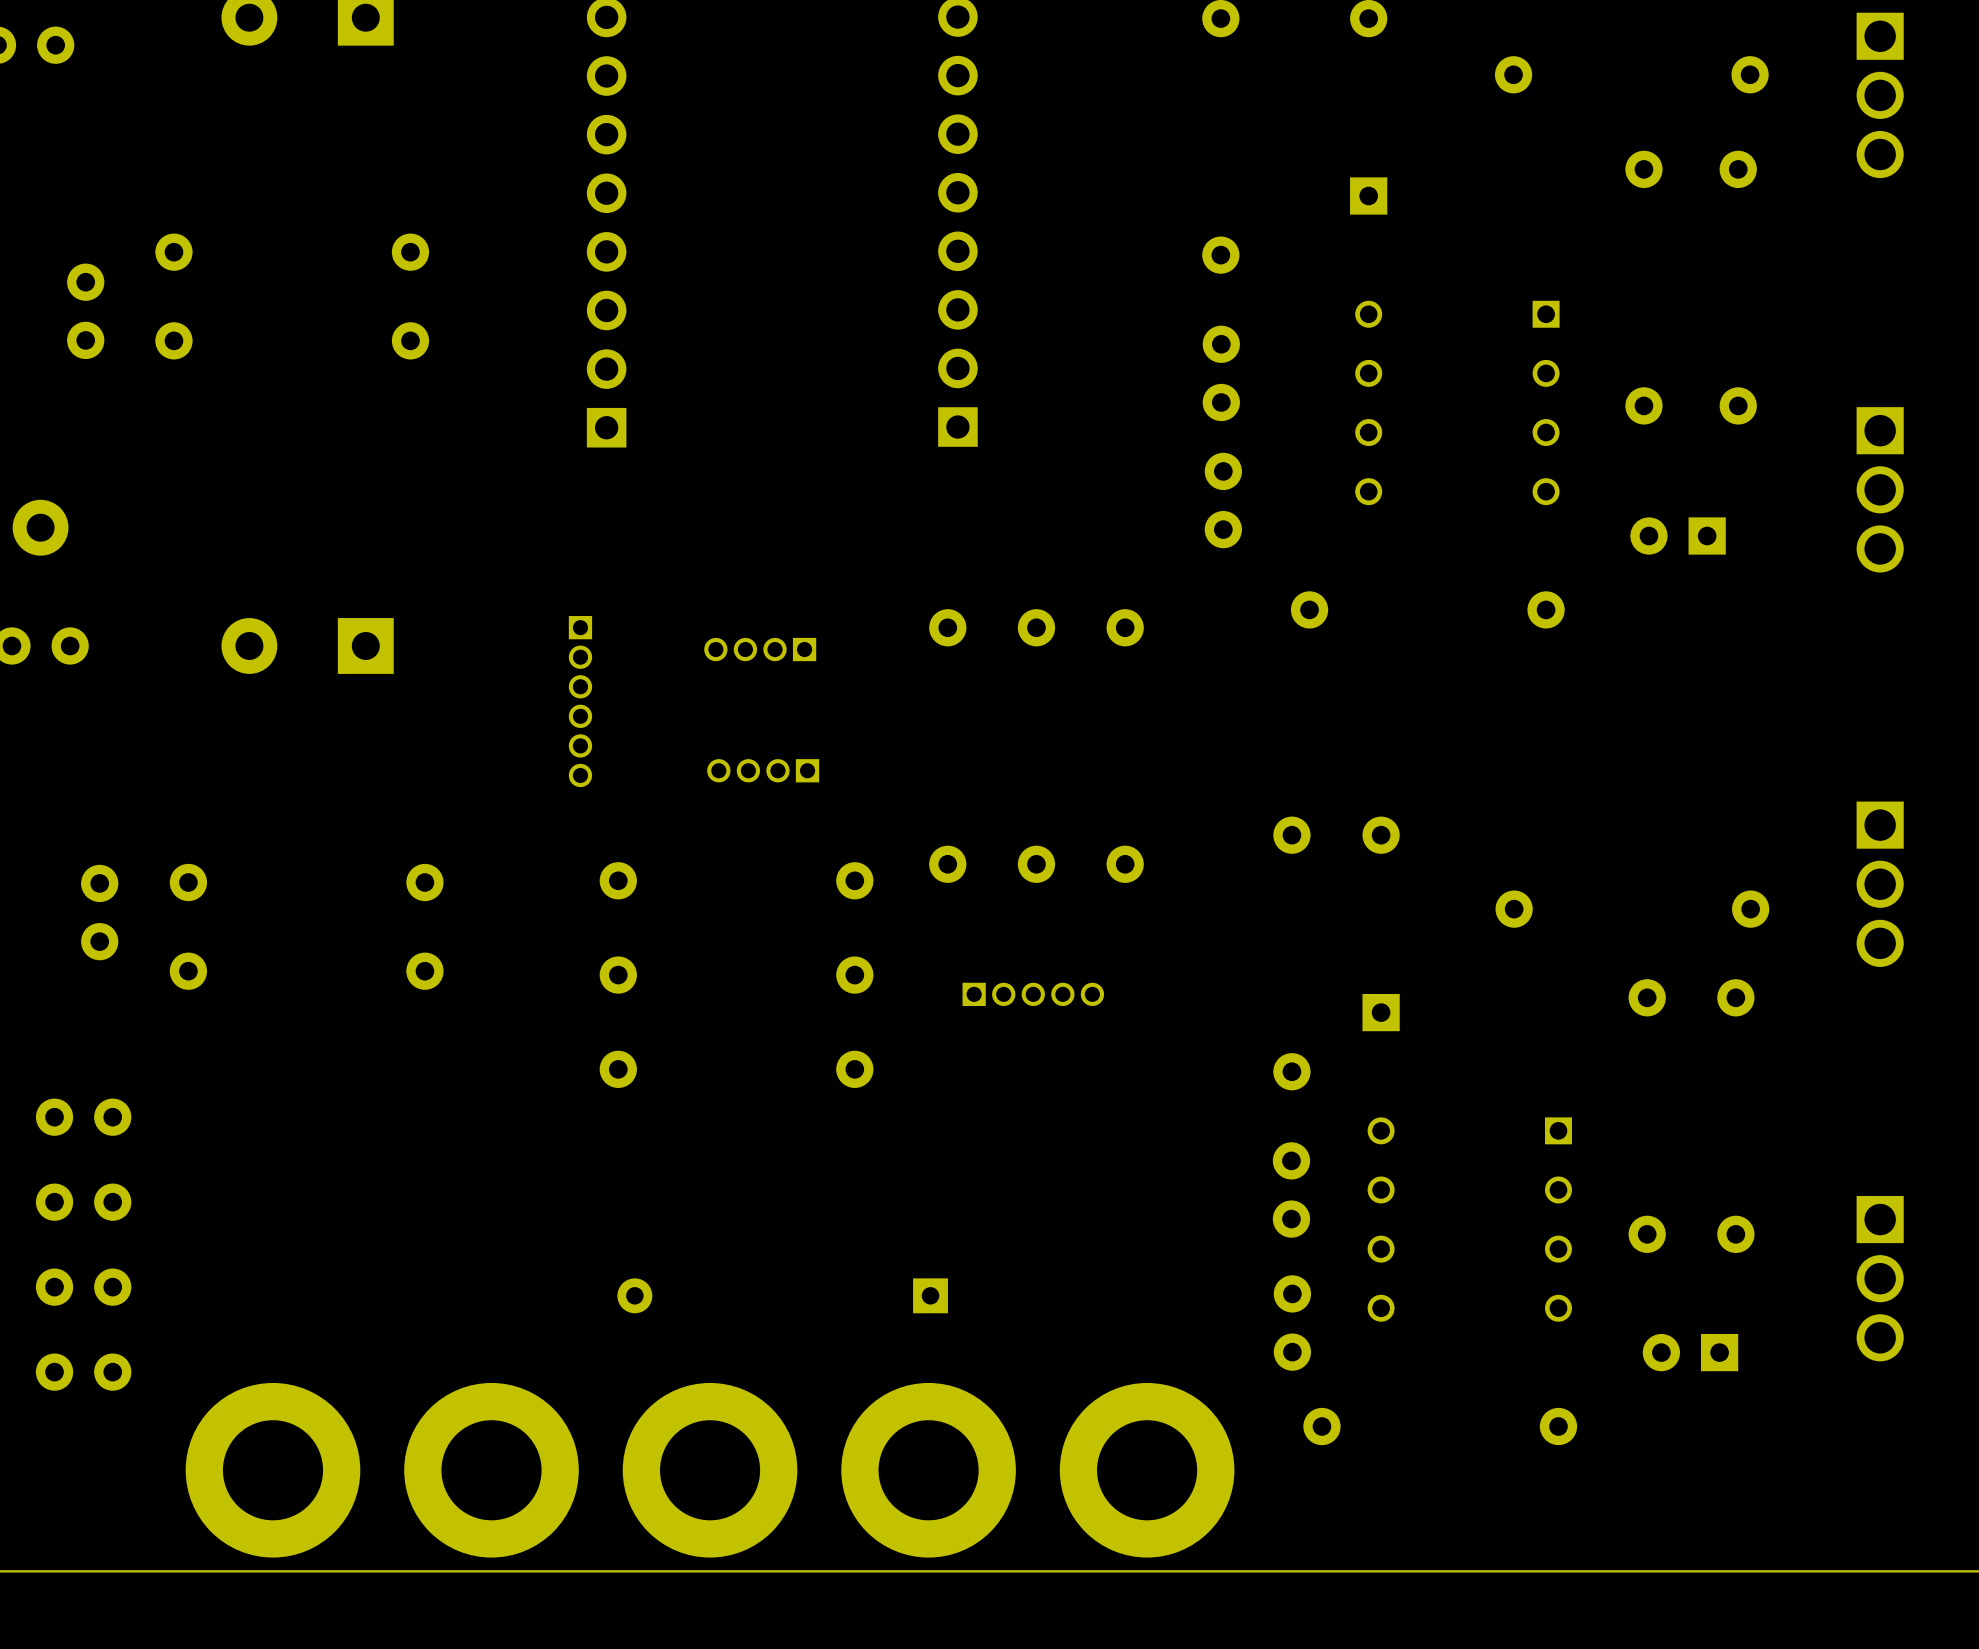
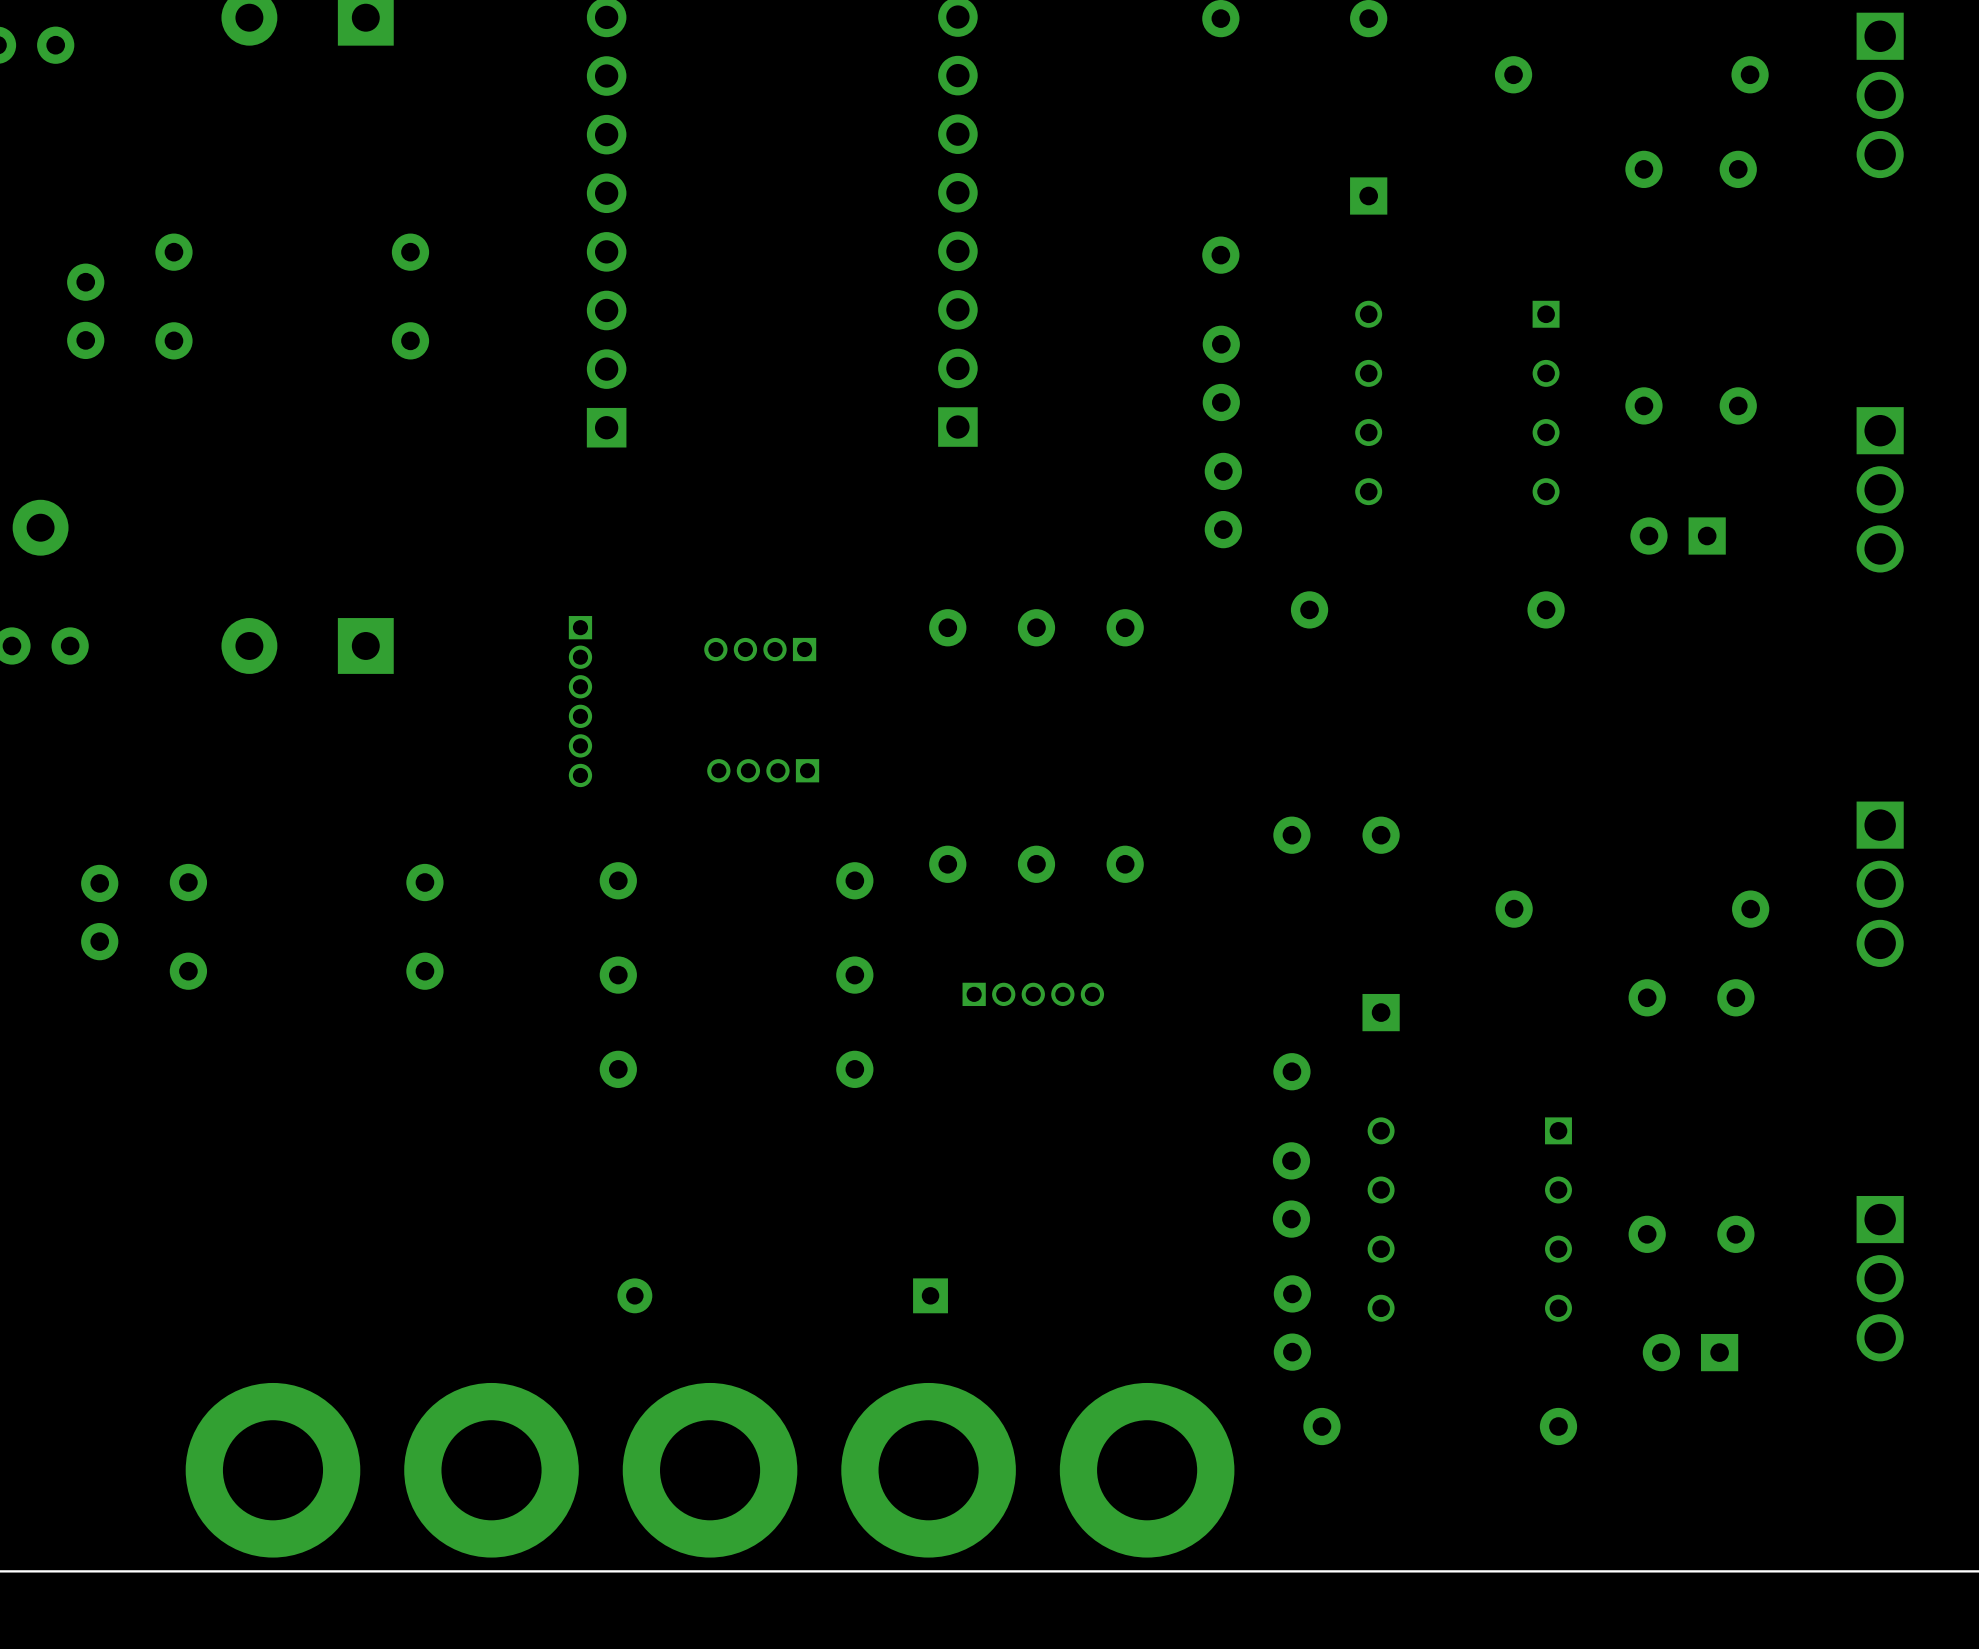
part: (83, 1117) -> none
part: (83, 1202) -> none
part: (83, 1287) -> none
part: (83, 1372) -> none

